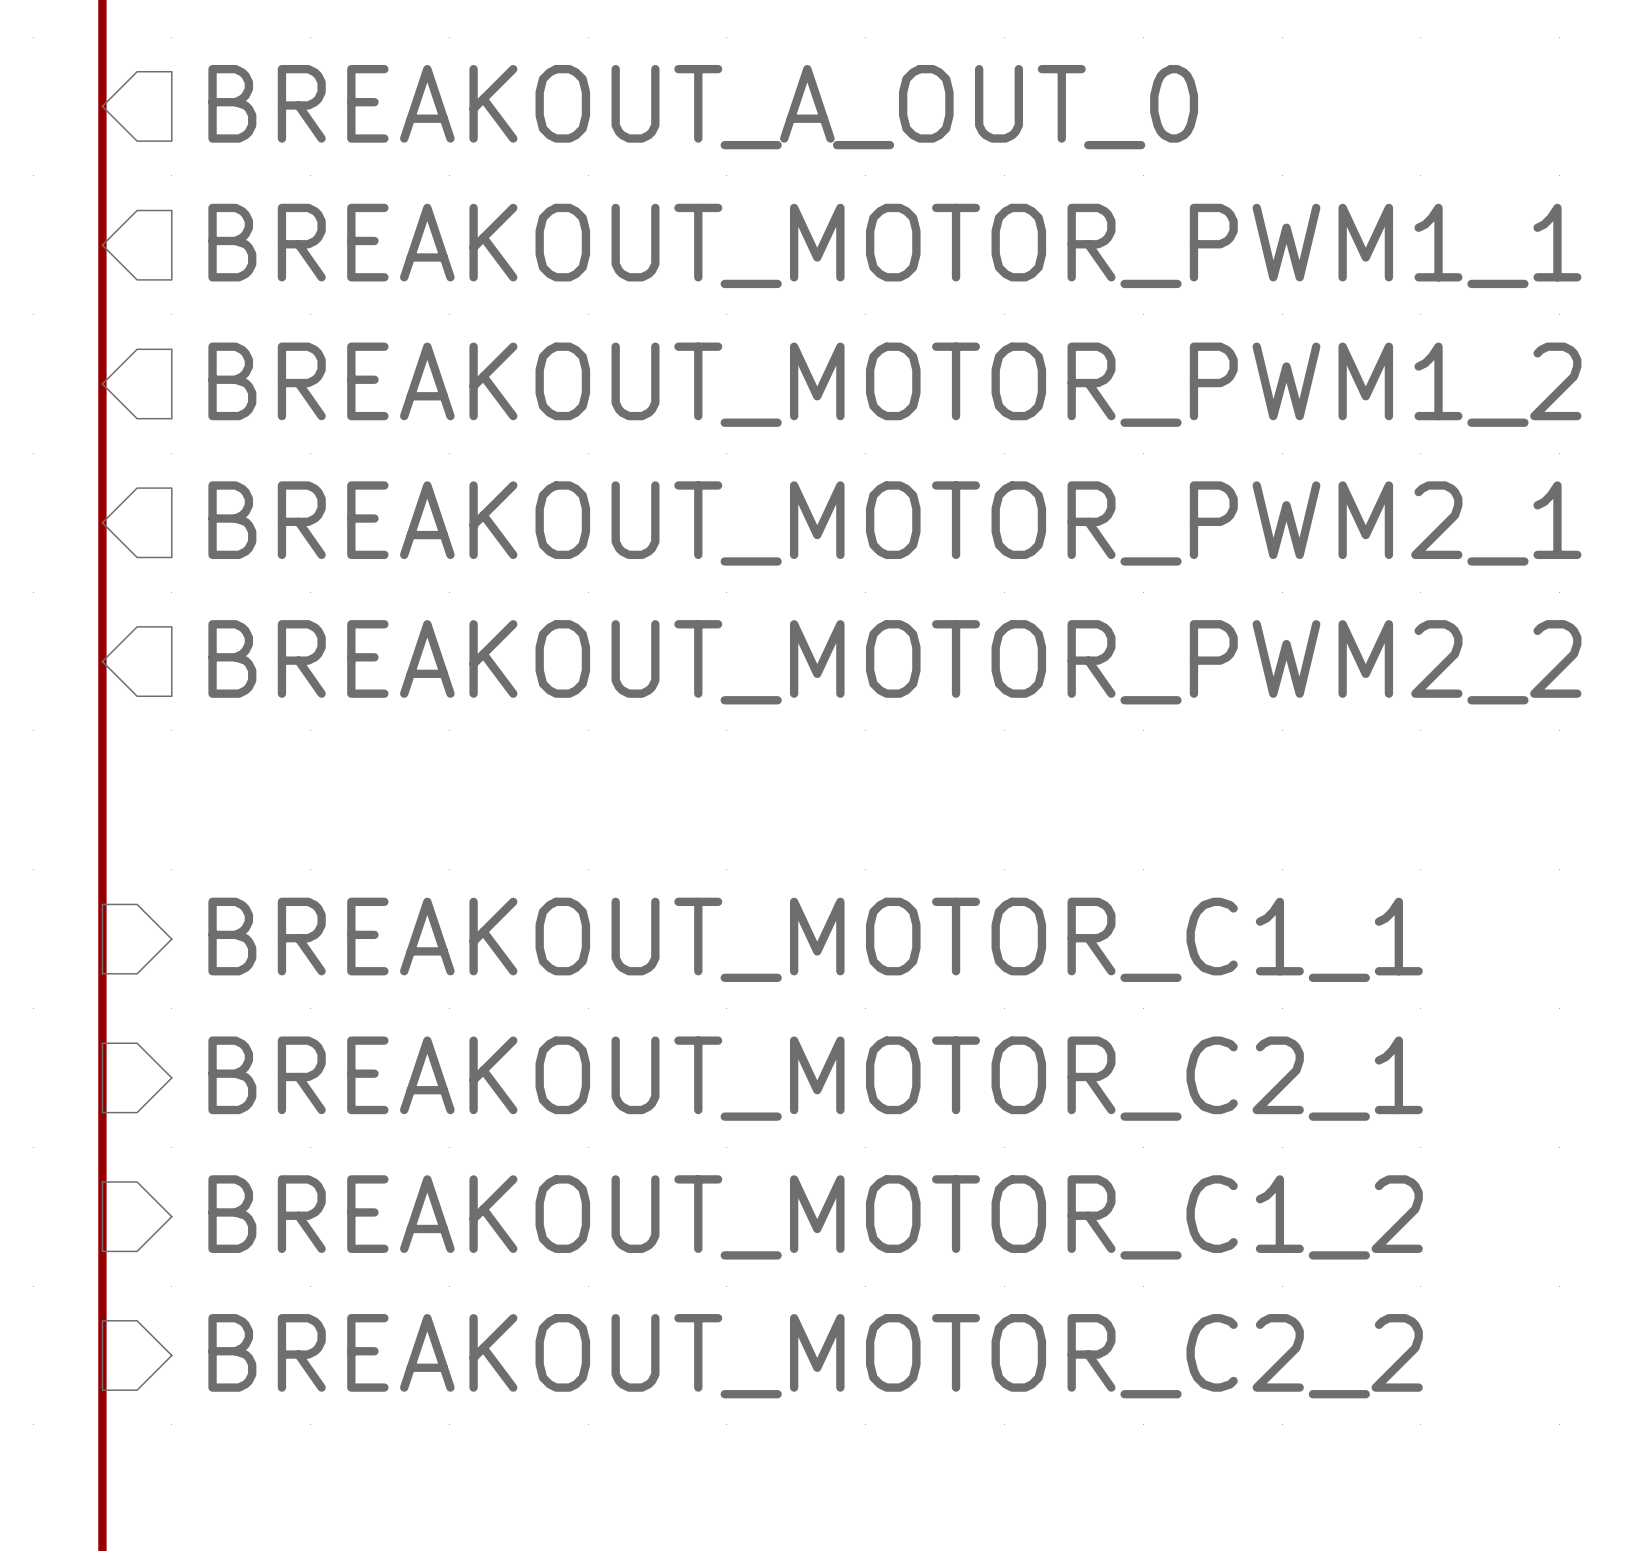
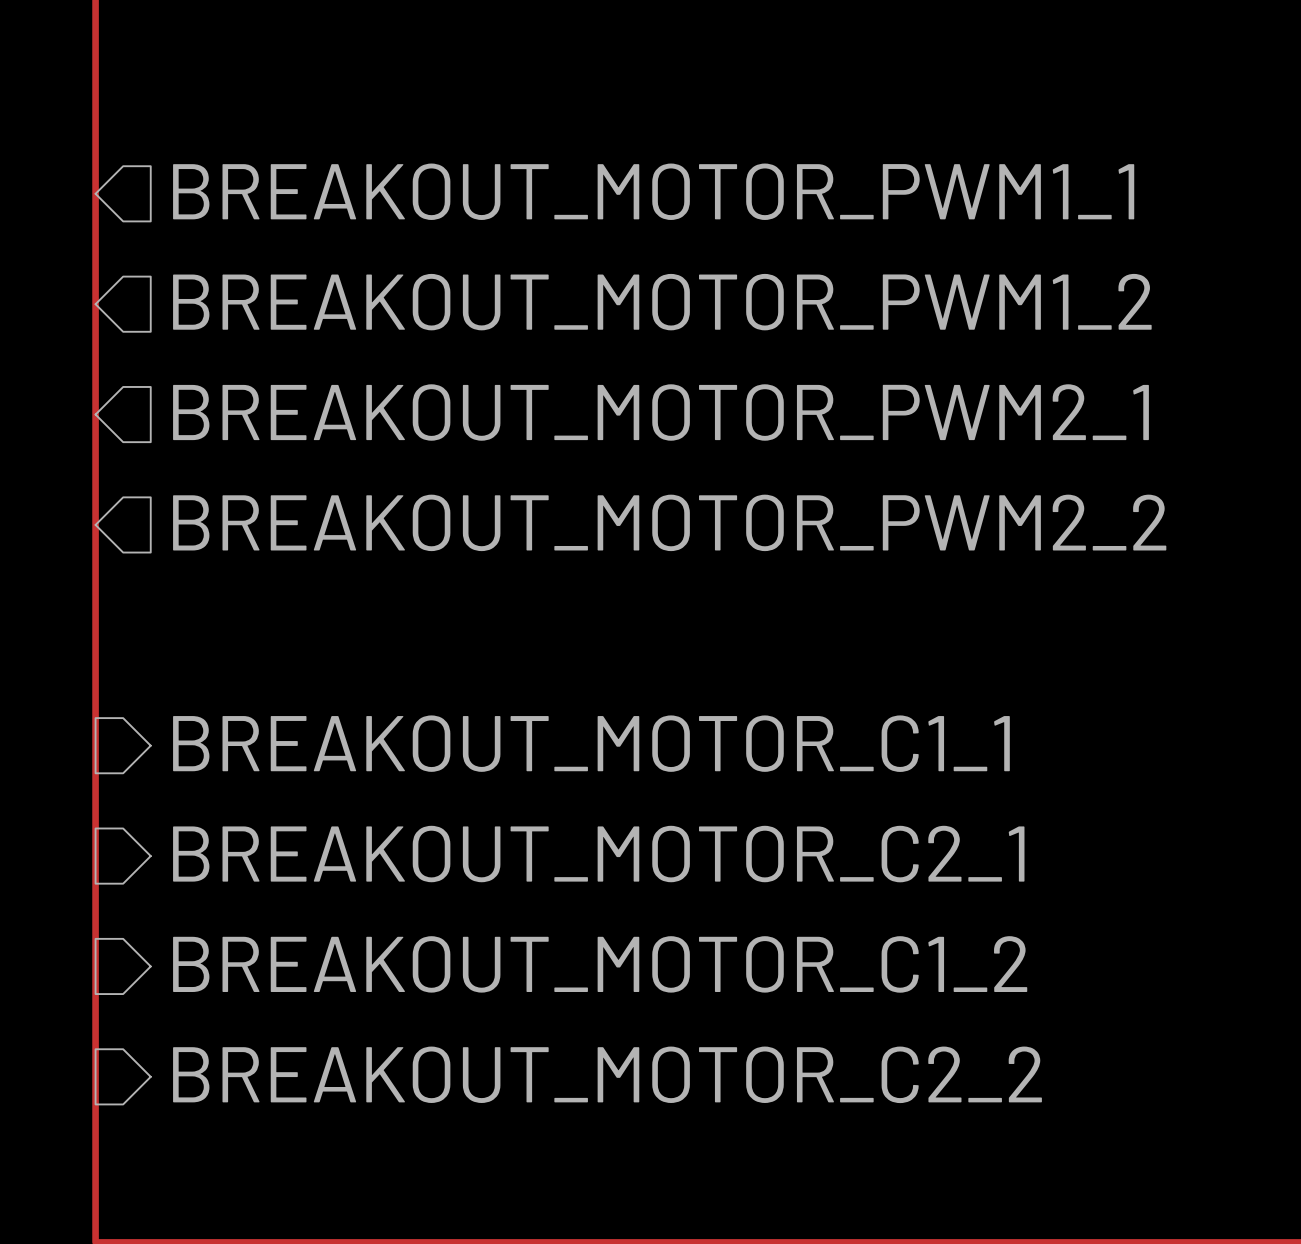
sheet pin: BREAKOUT_A_OUT_0 (703, 107) -> none

